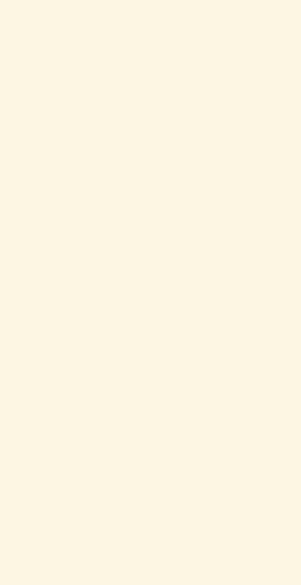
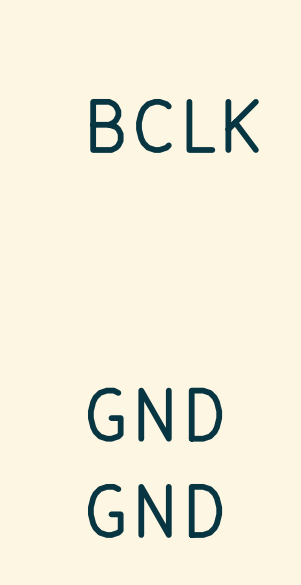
label: none -> BCLK (174, 125)
label: none -> GND (155, 414)
label: none -> GND (155, 510)

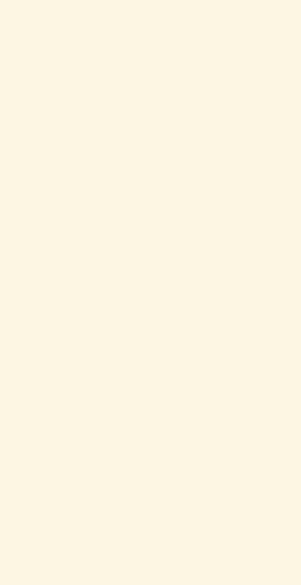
label: BCLK (174, 125) -> none
label: GND (155, 414) -> none
label: GND (155, 510) -> none

